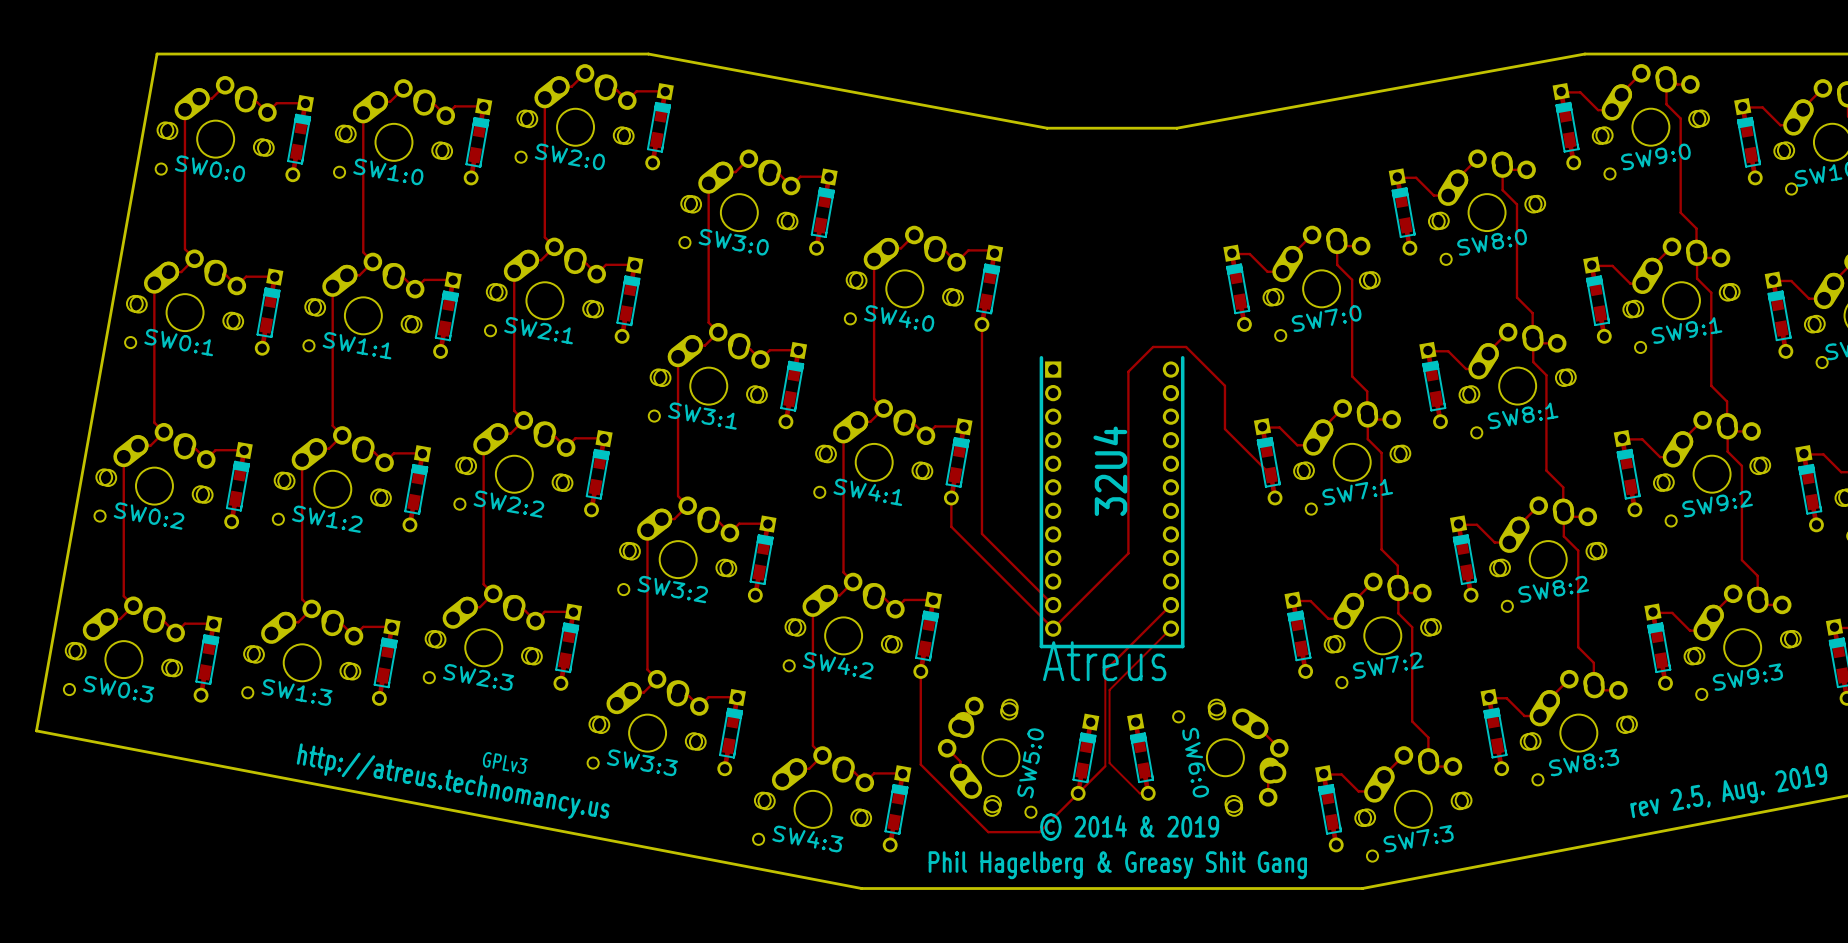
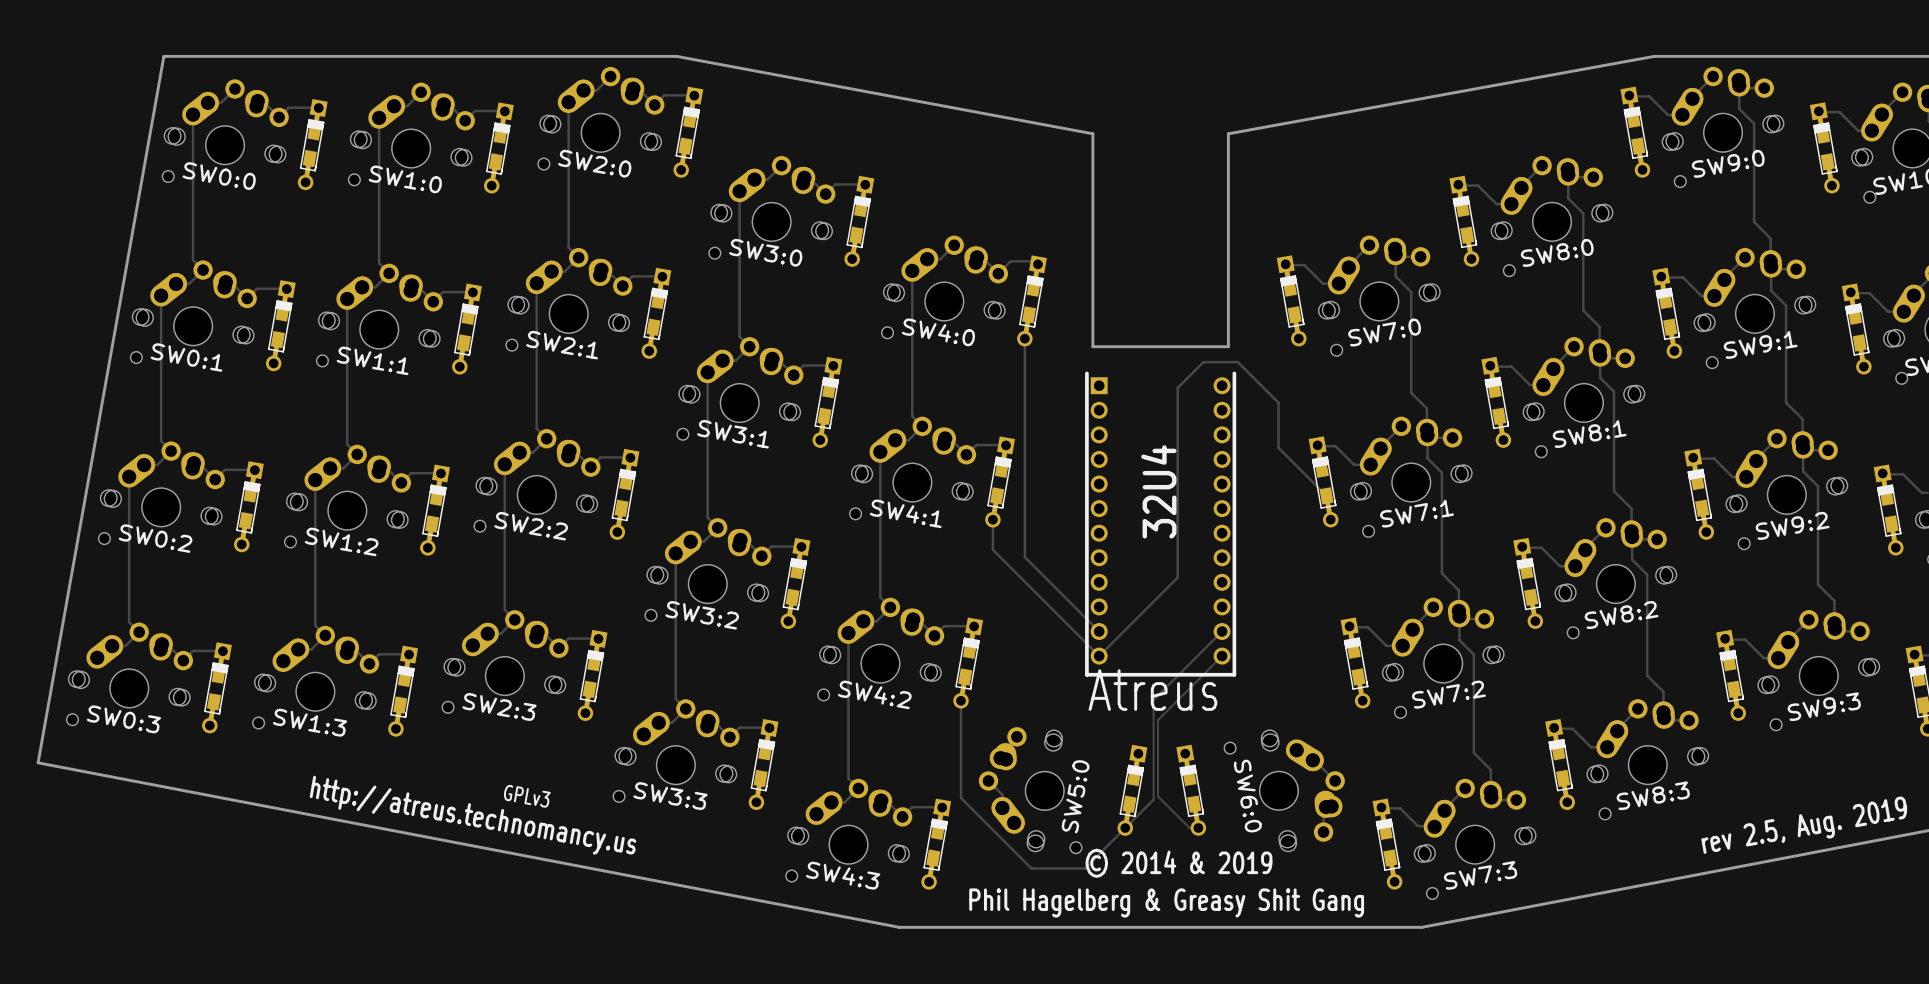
board edge: (1047, 128) (1176, 128) -> (1092, 133) (1092, 346) (1228, 346) (1228, 133)

